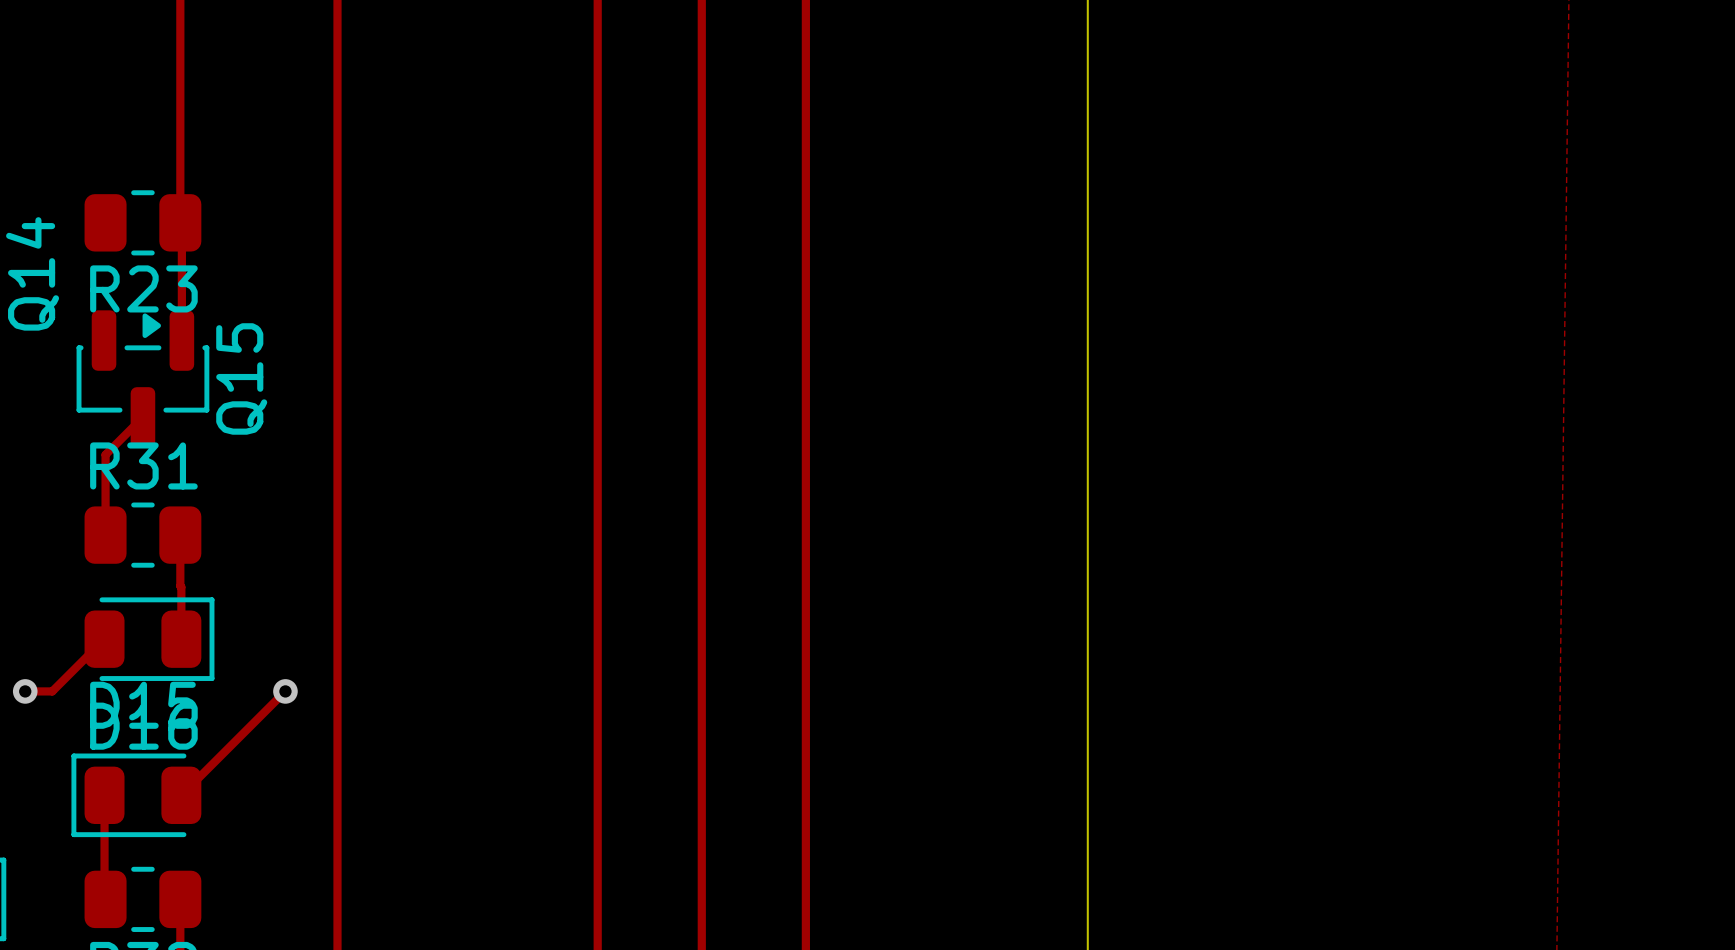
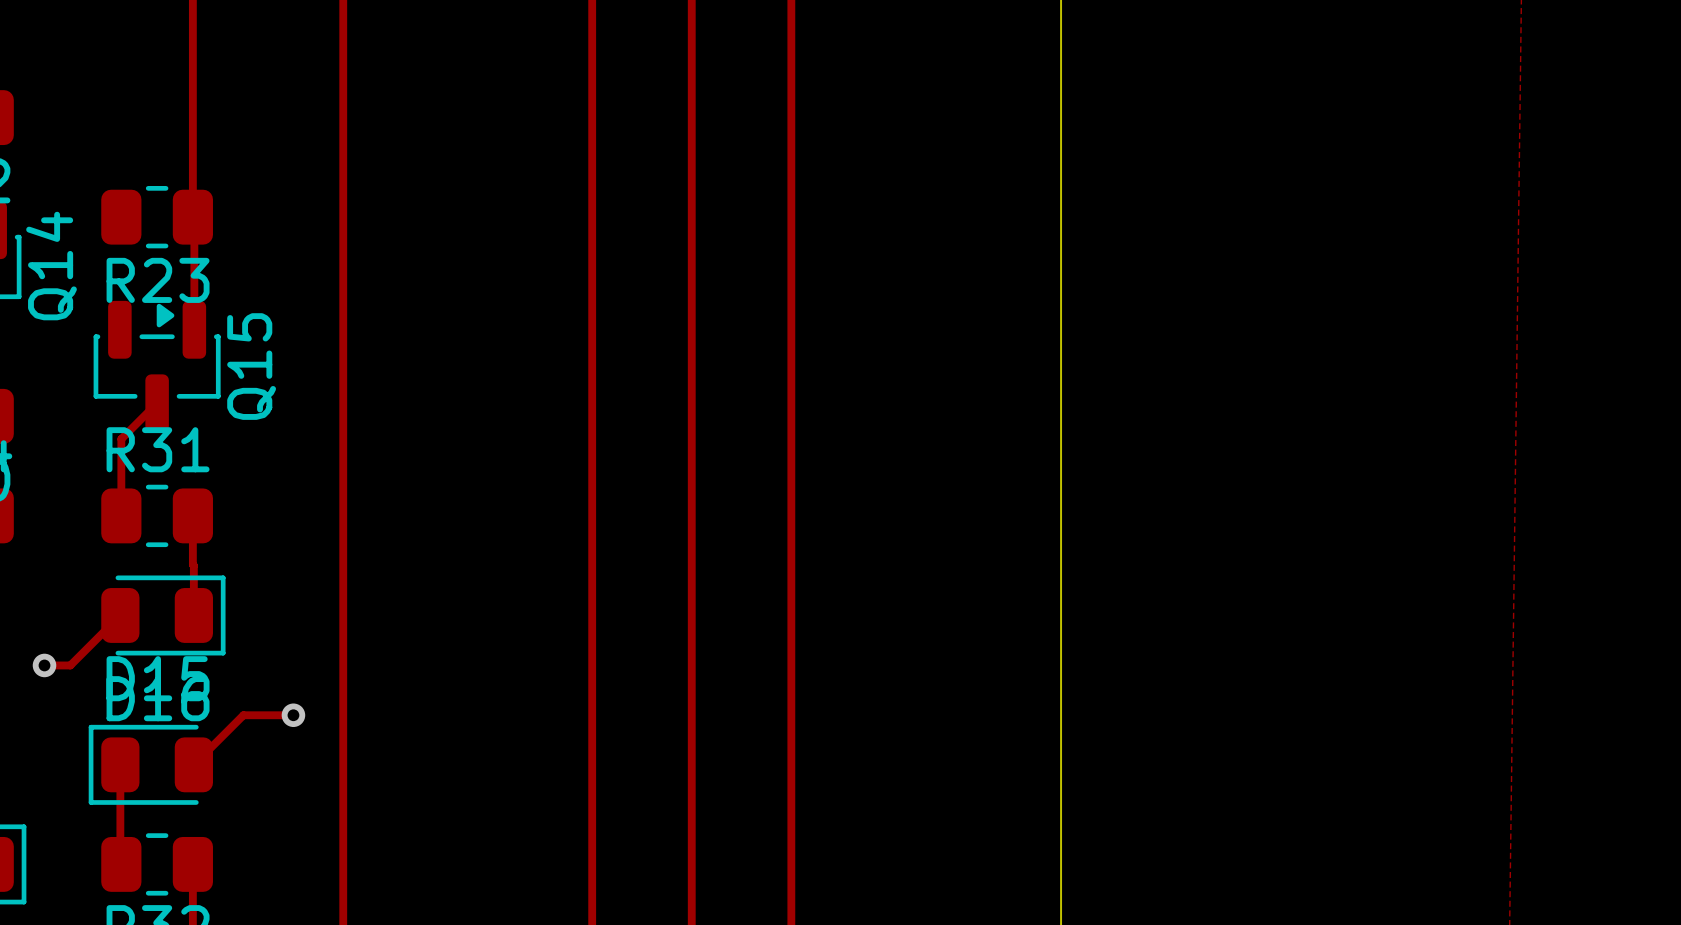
top track: (285, 691) (233, 743) -> (293, 715) (243, 715)
via position: (285, 691) -> (293, 715)

